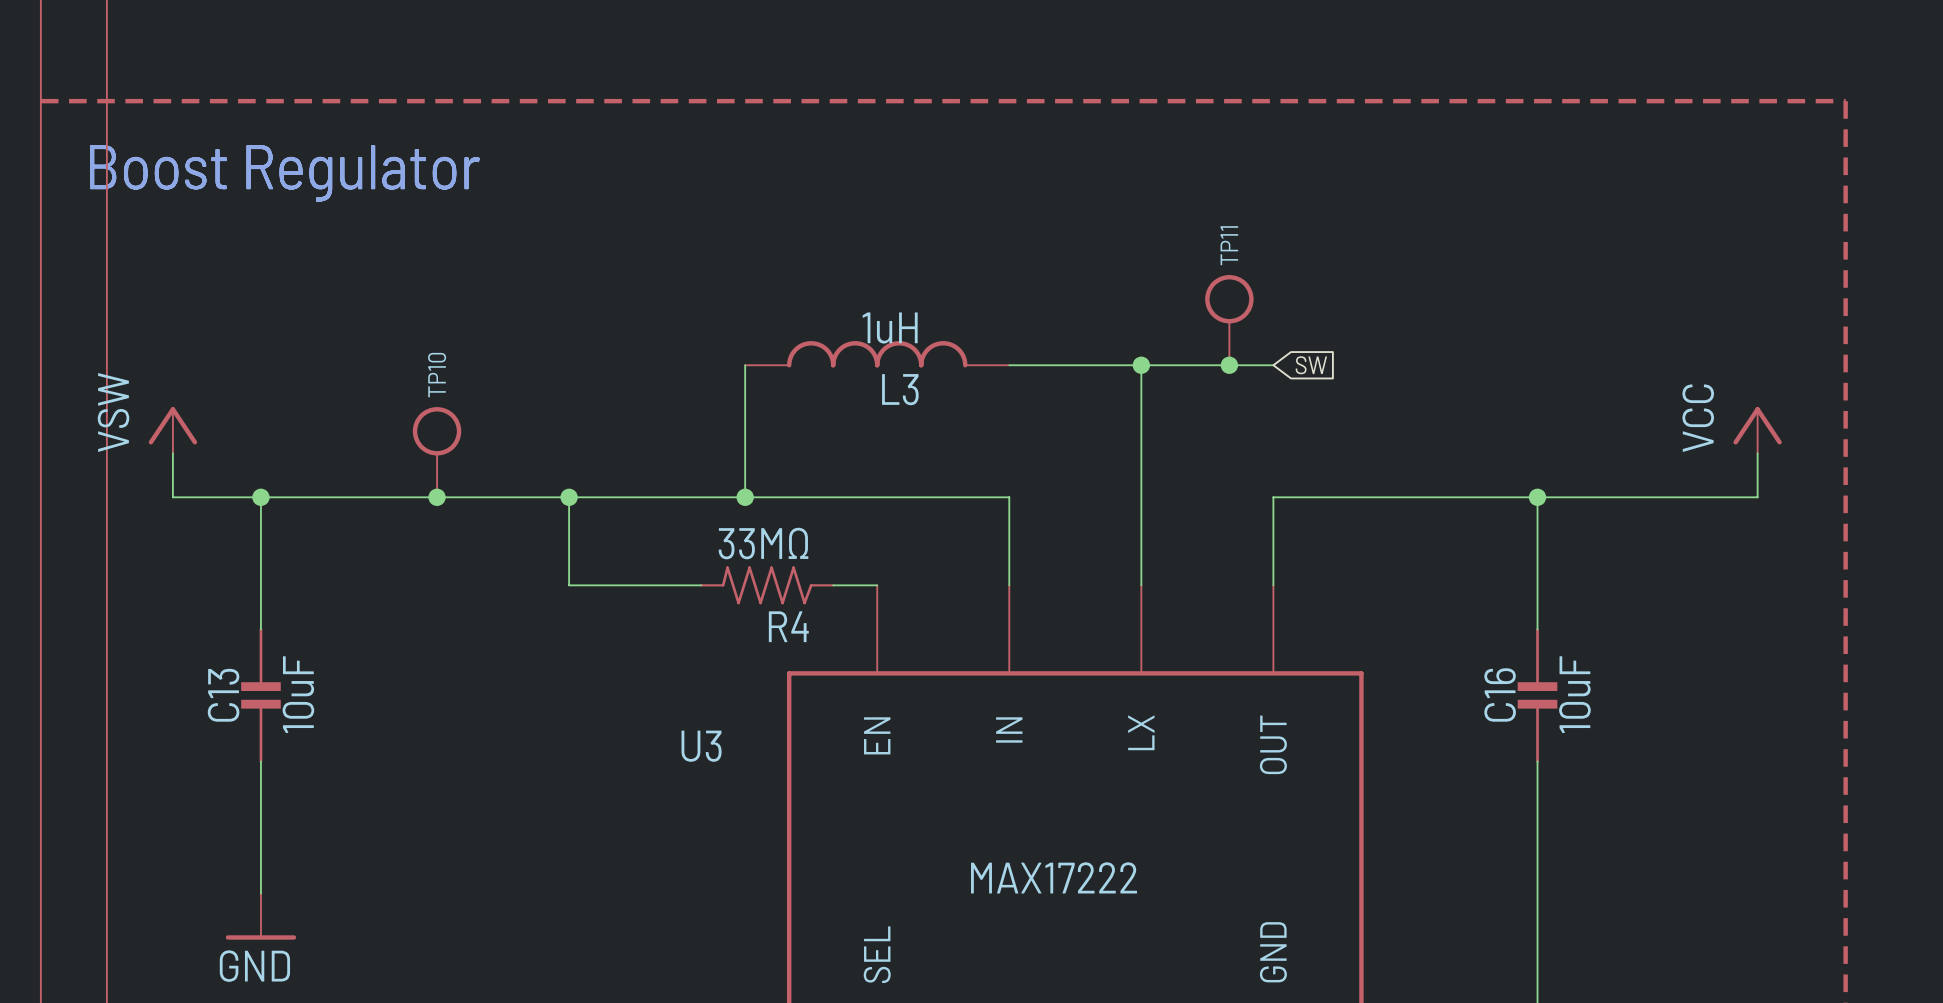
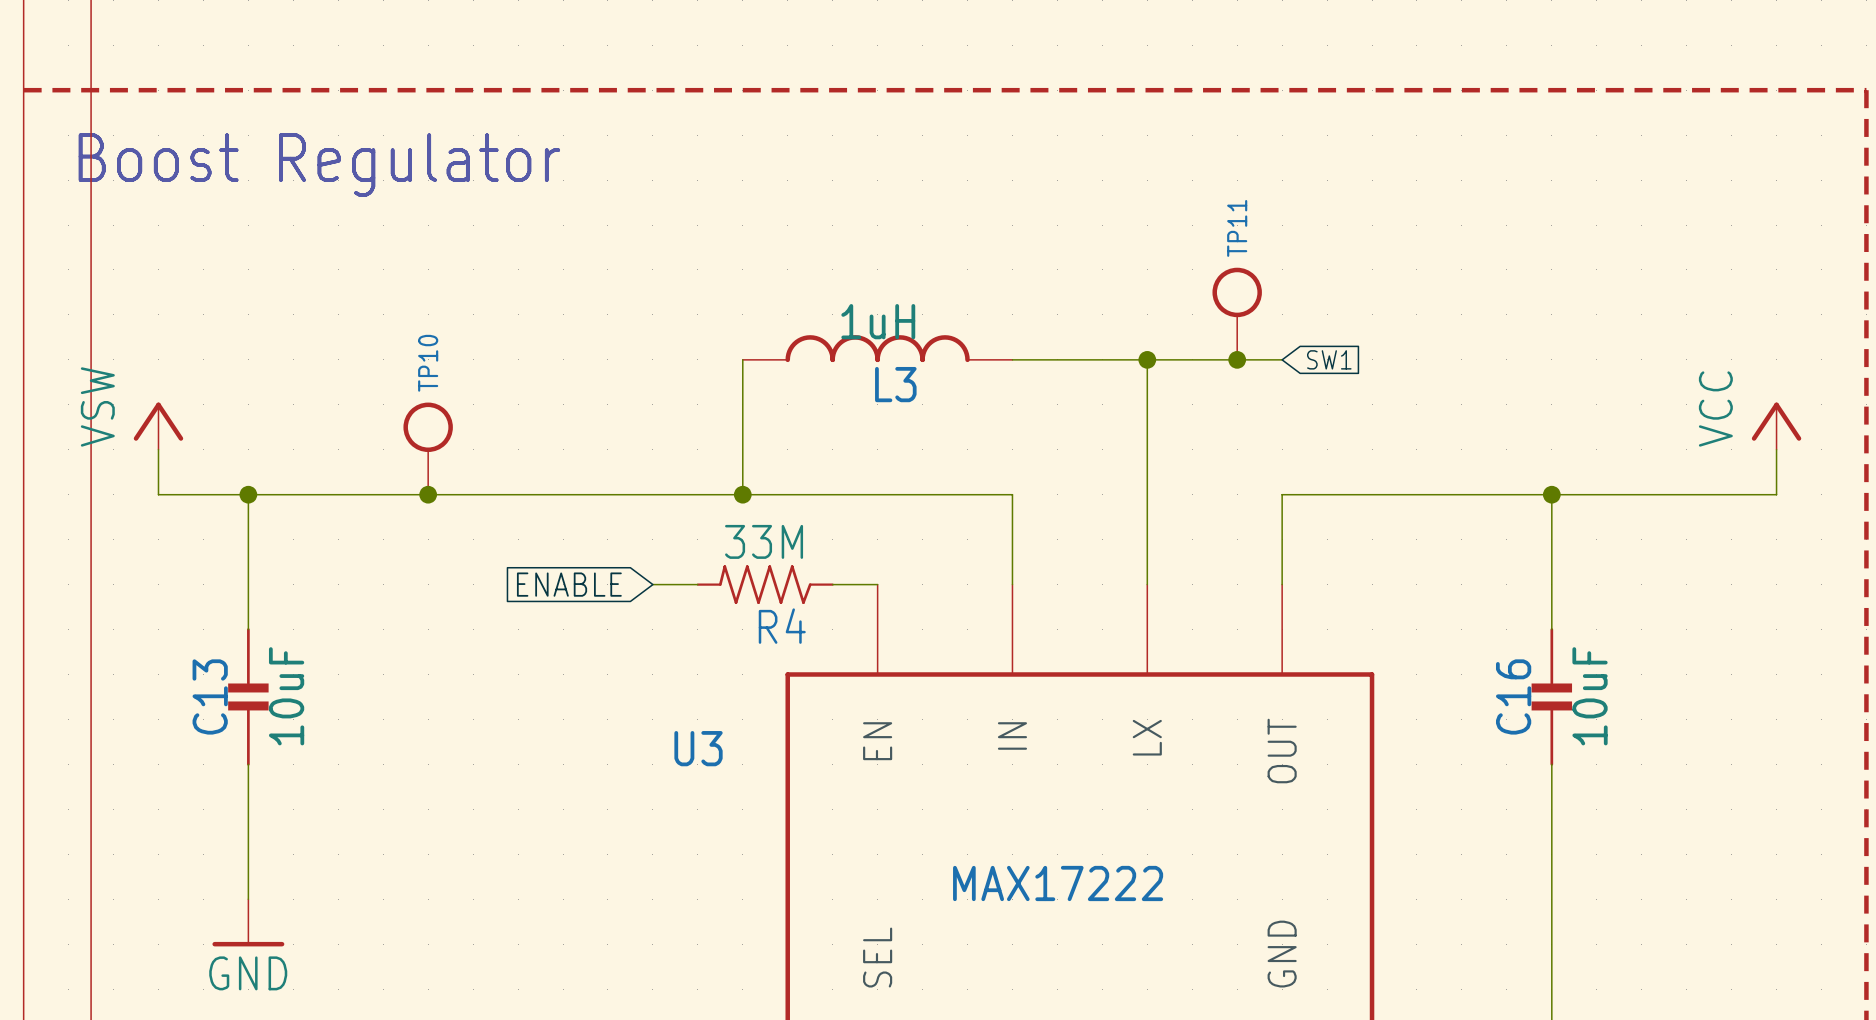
global label: SW (1311, 365) -> SW1 (1329, 359)
wire: (569, 497) (569, 585) (657, 585) -> none
junction: (569, 497) -> none
R4 value: 33MΩ (763, 543) -> 33M (764, 541)
global label: none -> ENABLE (569, 584)

